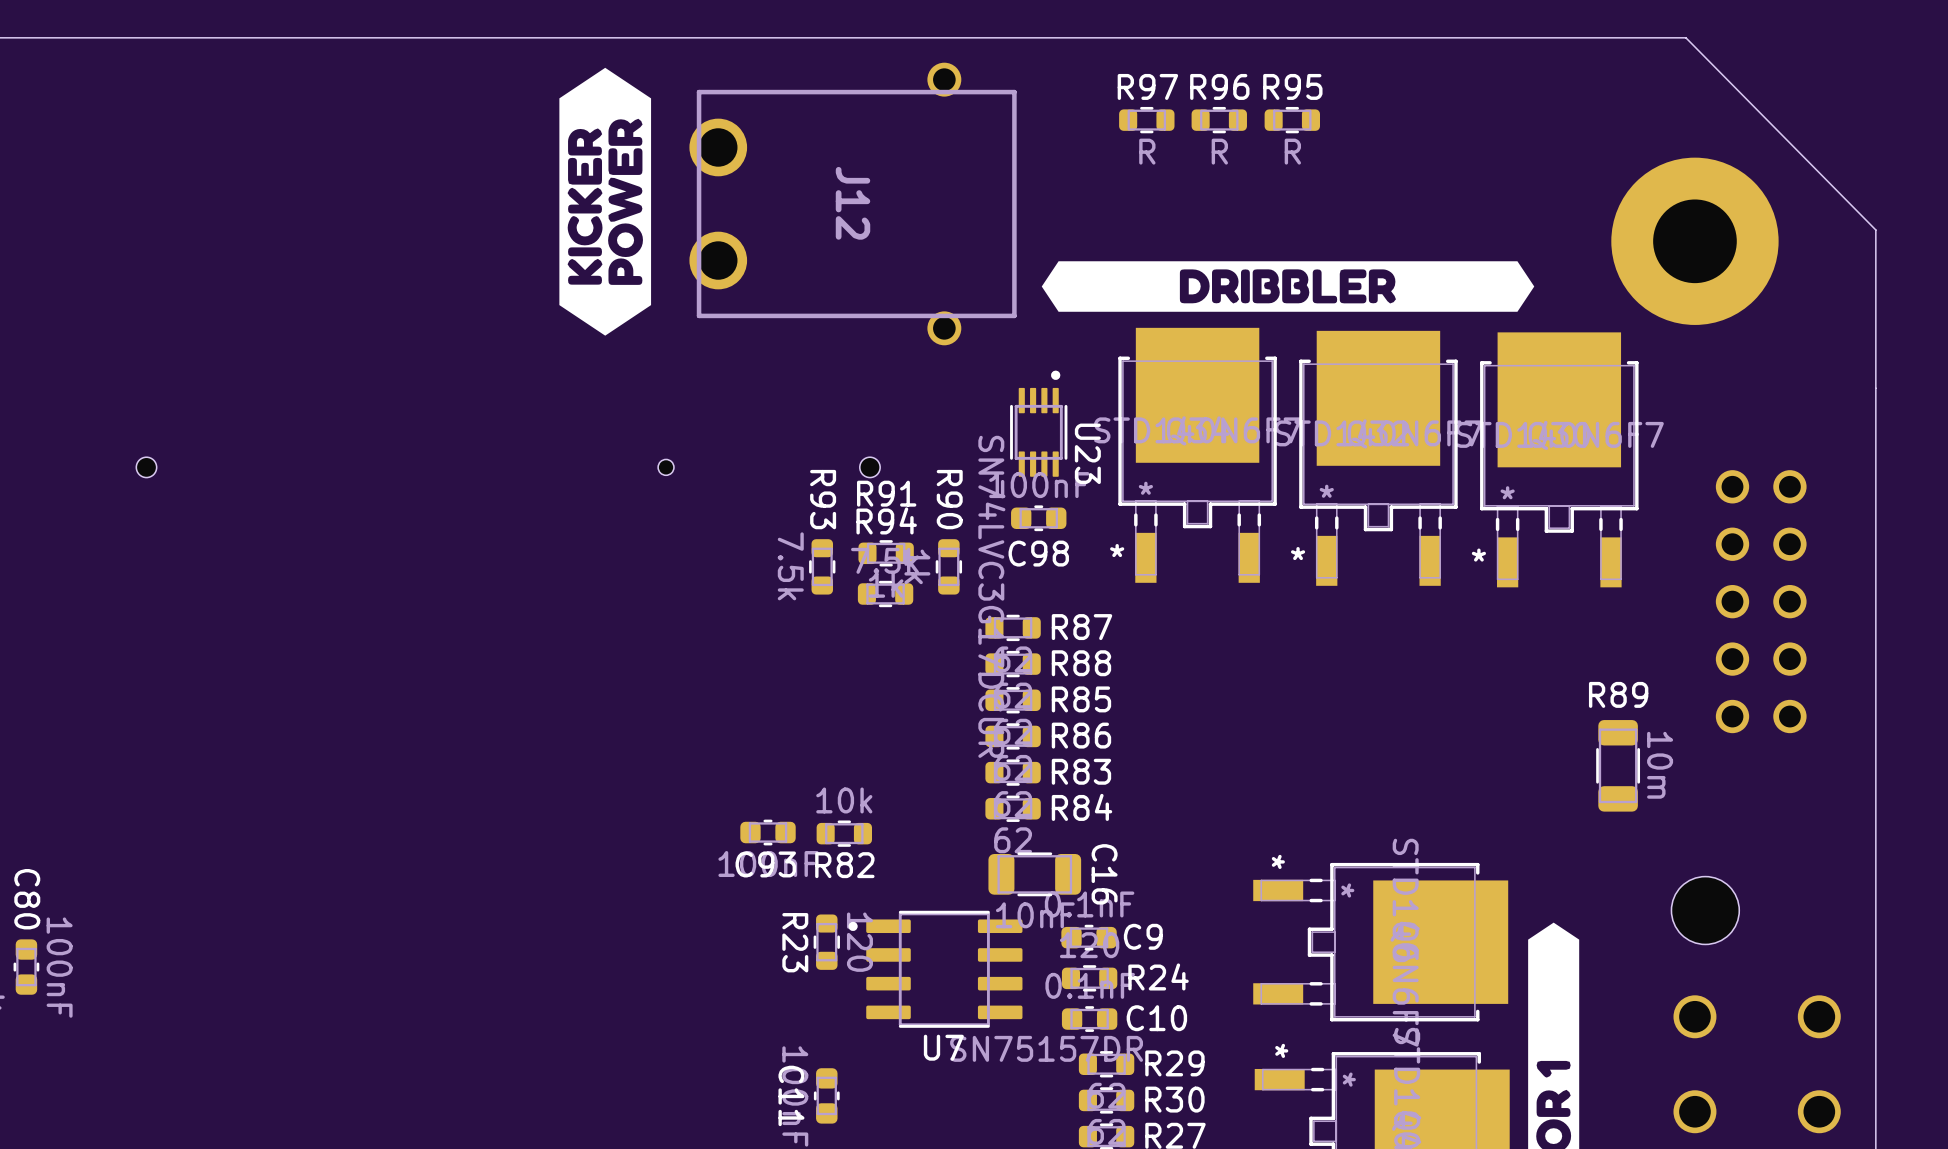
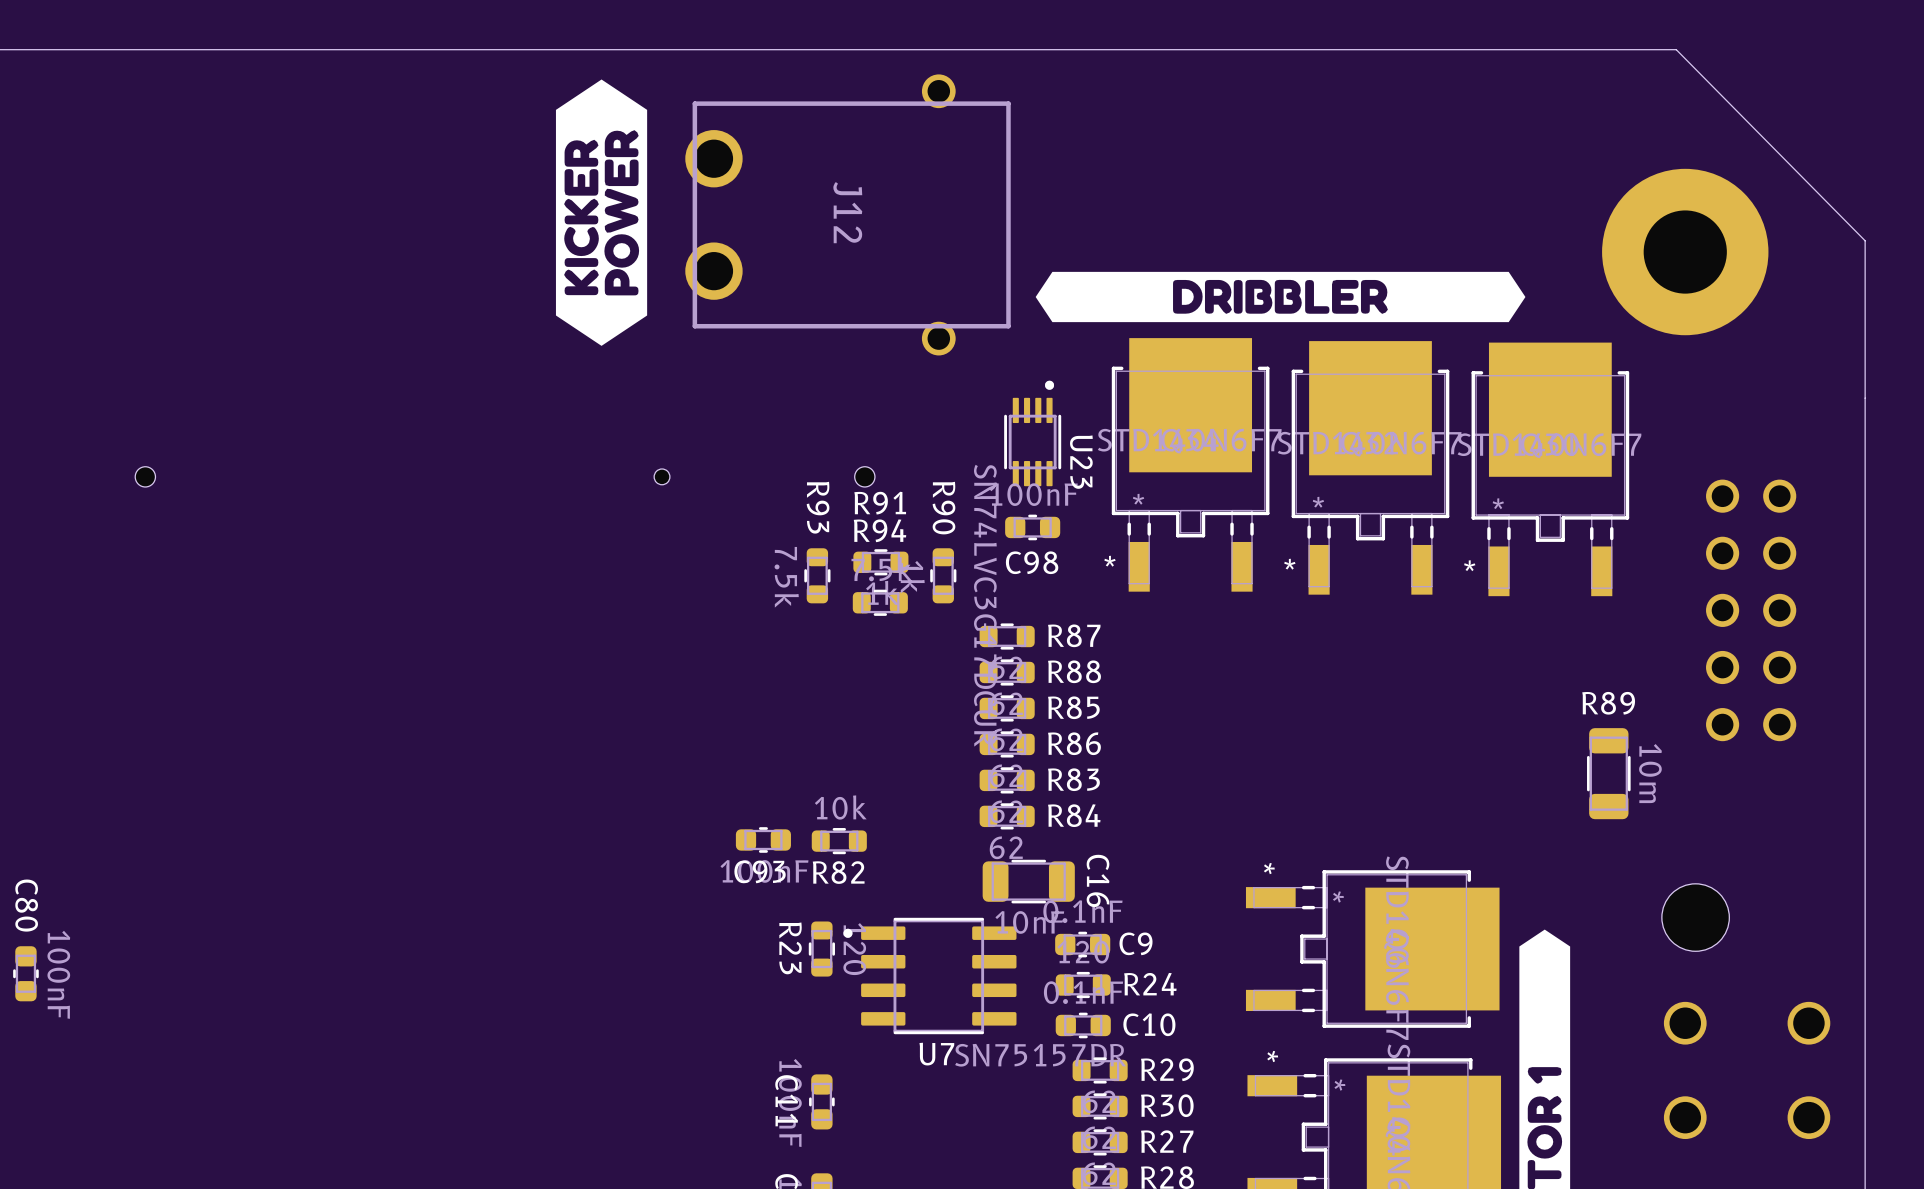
R97: R (1146, 120) -> none
R96: R (1219, 120) -> none
R95: R (1292, 120) -> none

